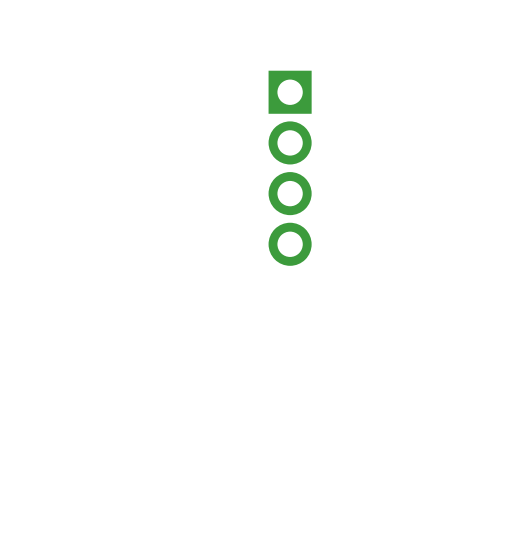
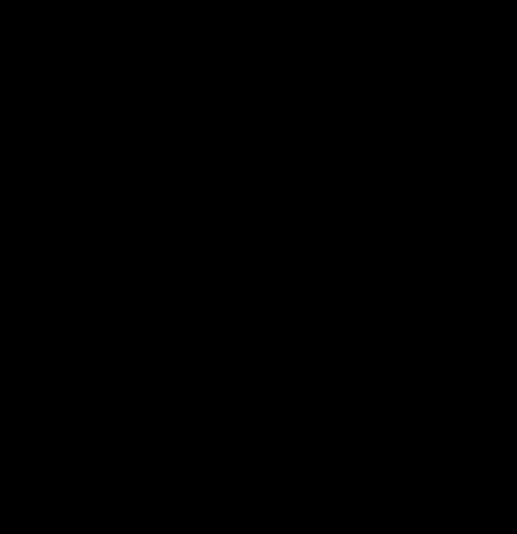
part: (290, 168) -> none

